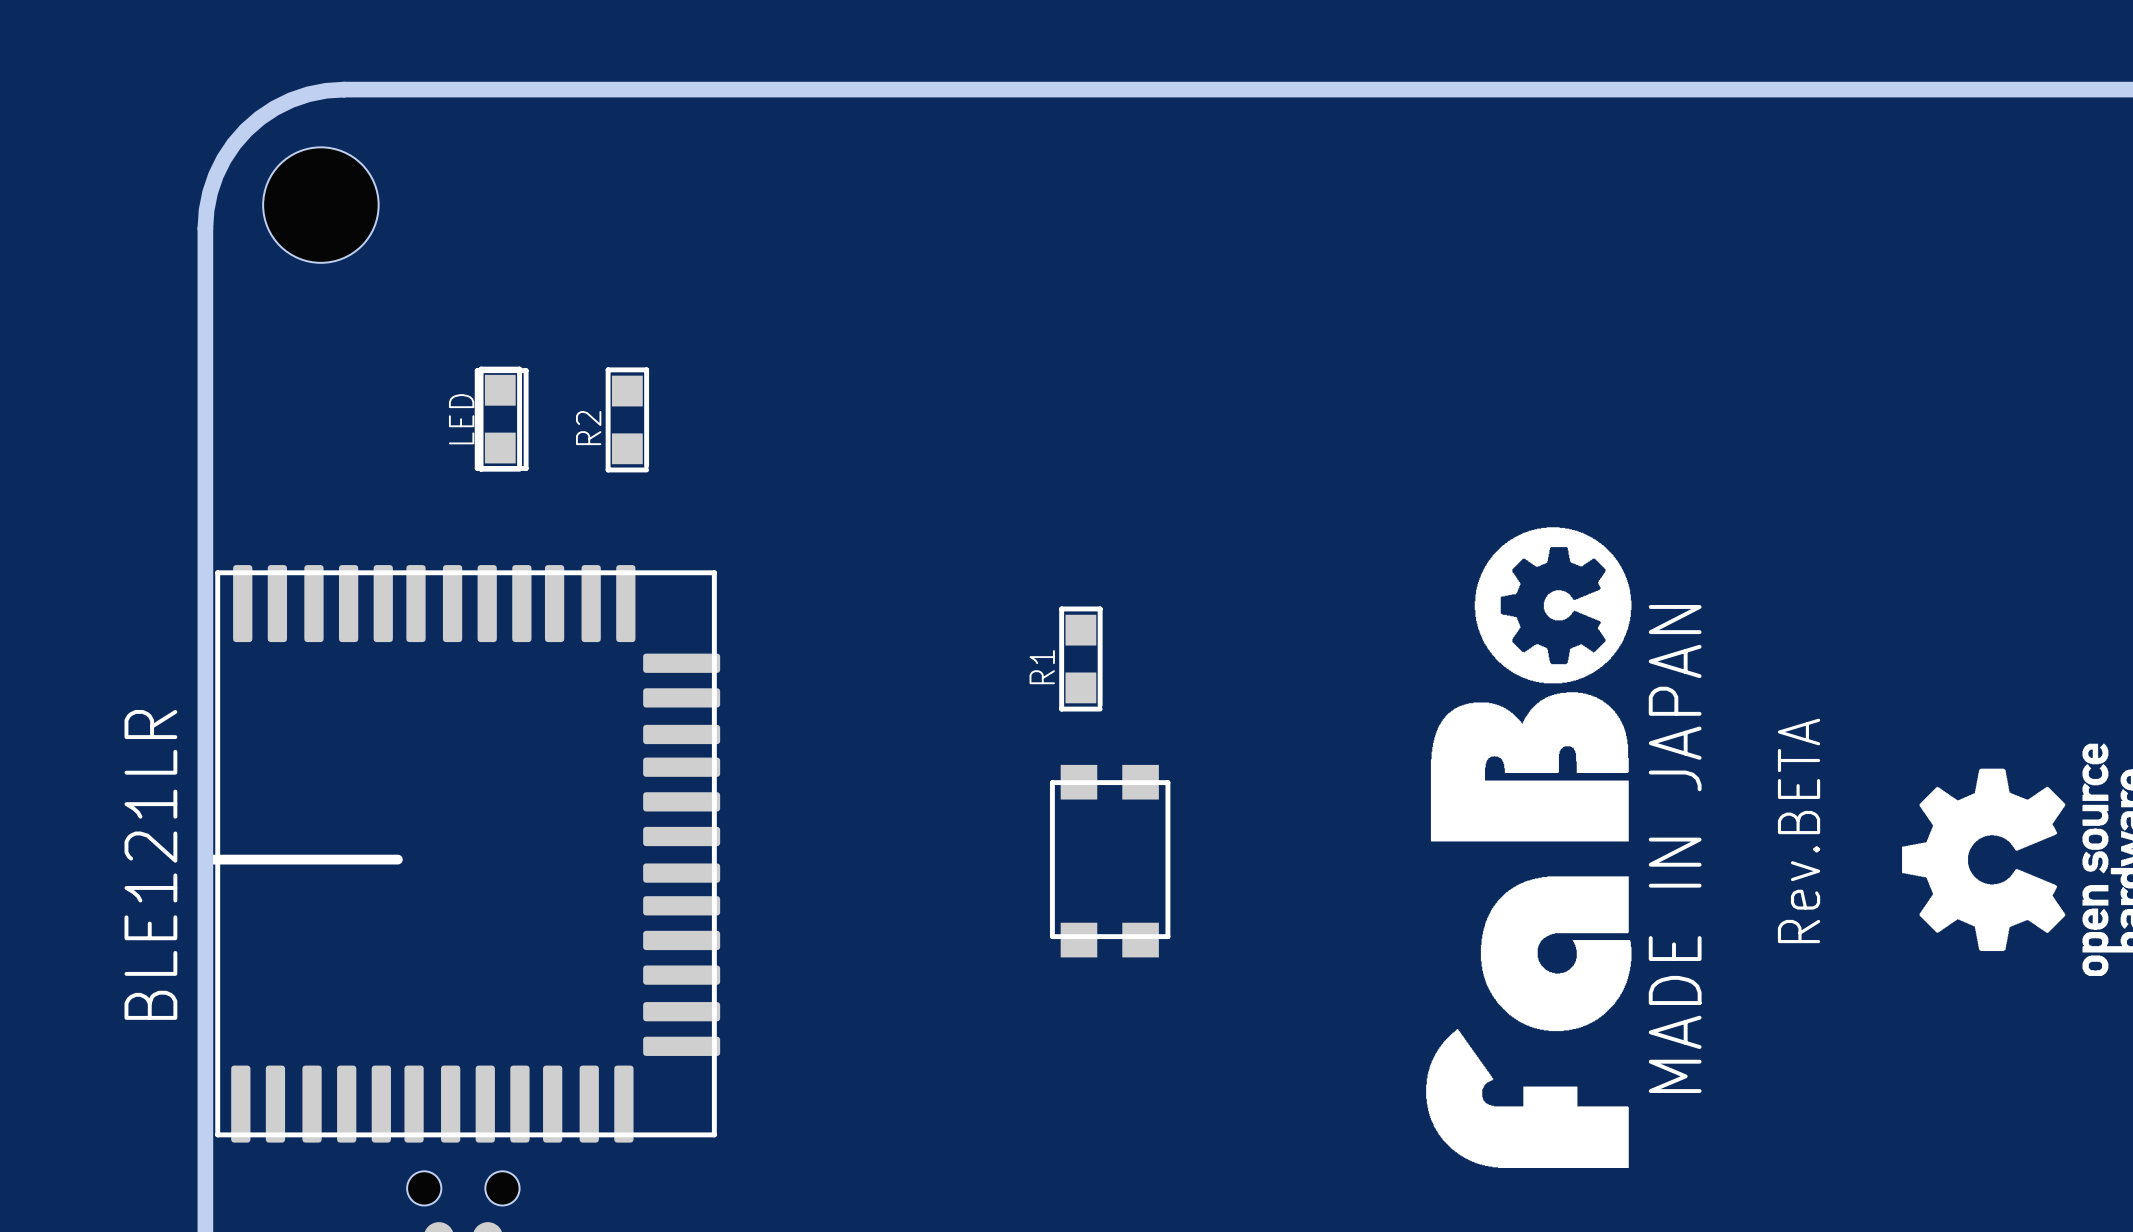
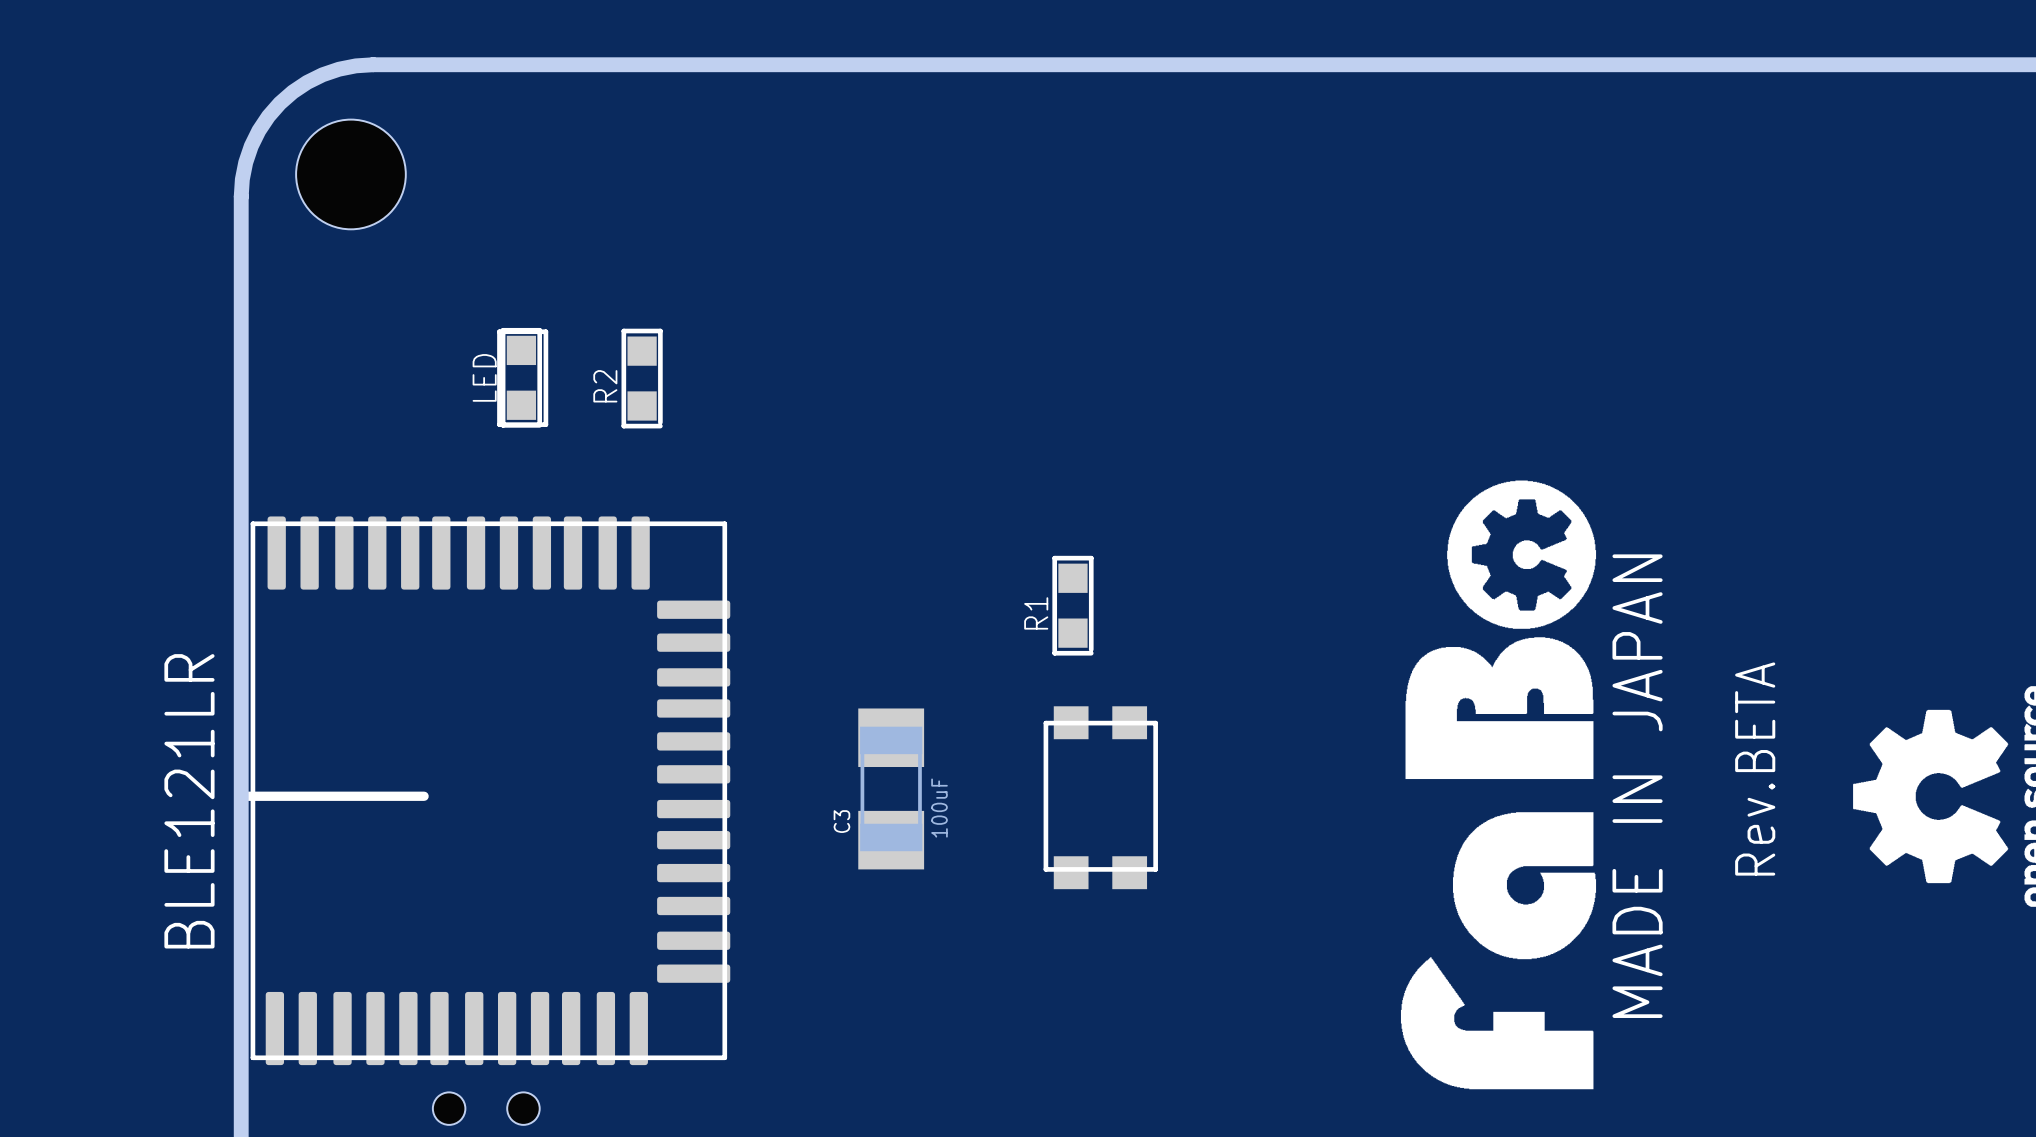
C3: none -> 100uF (891, 788)

